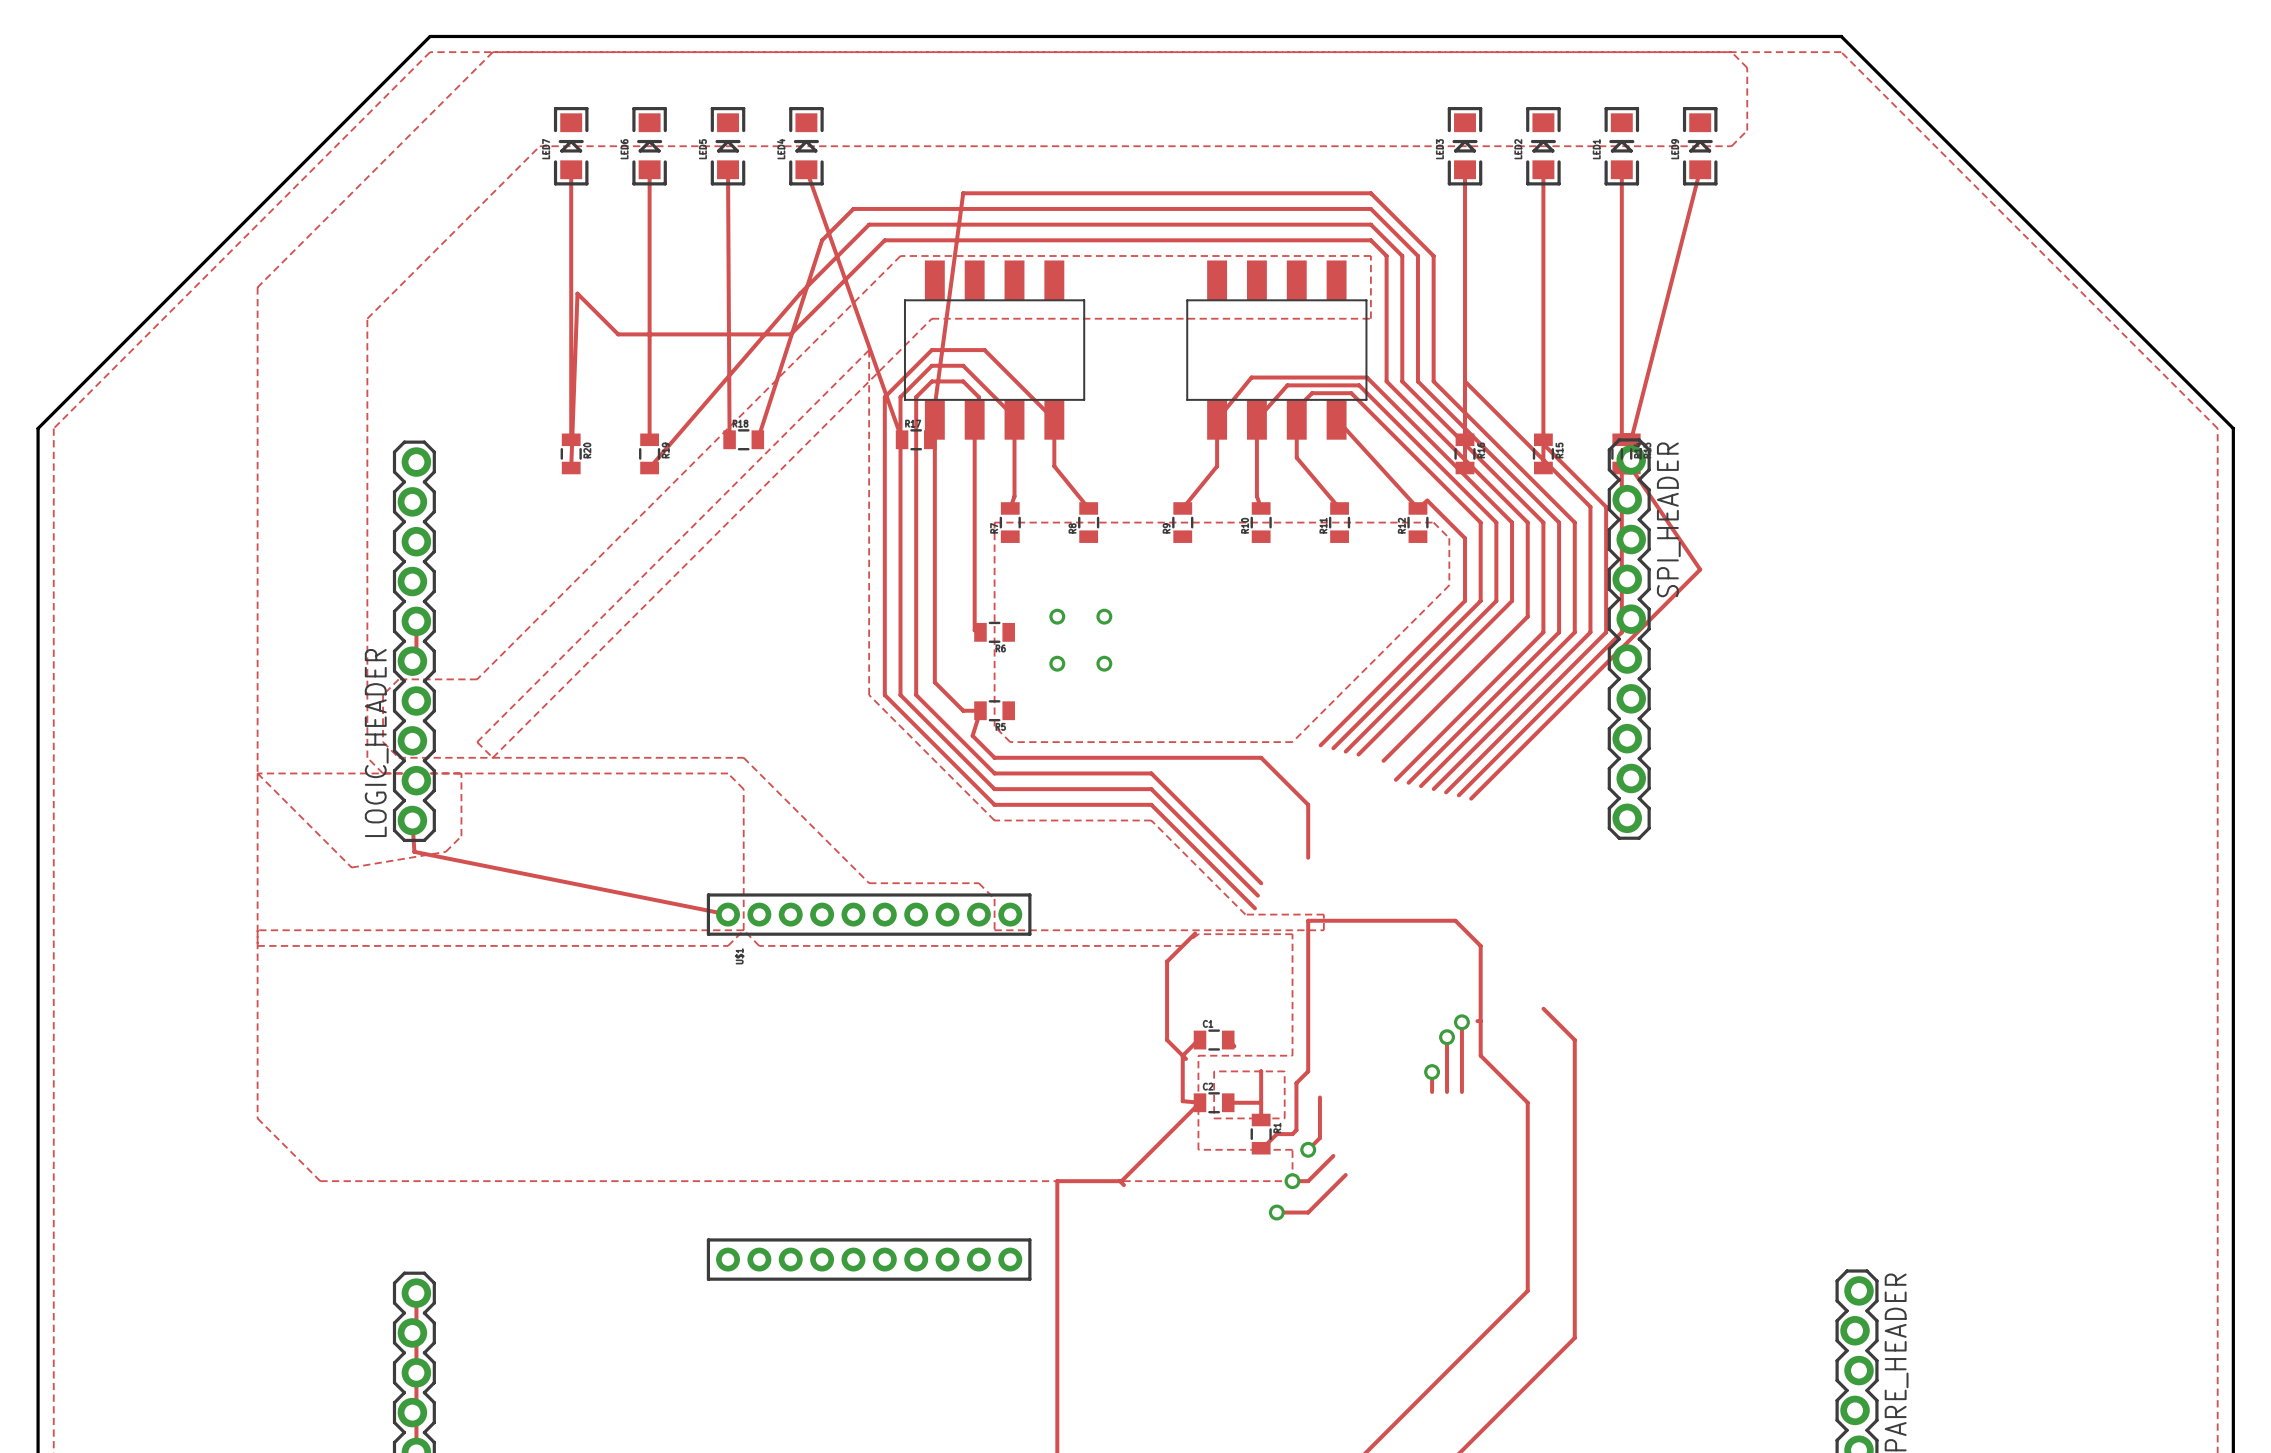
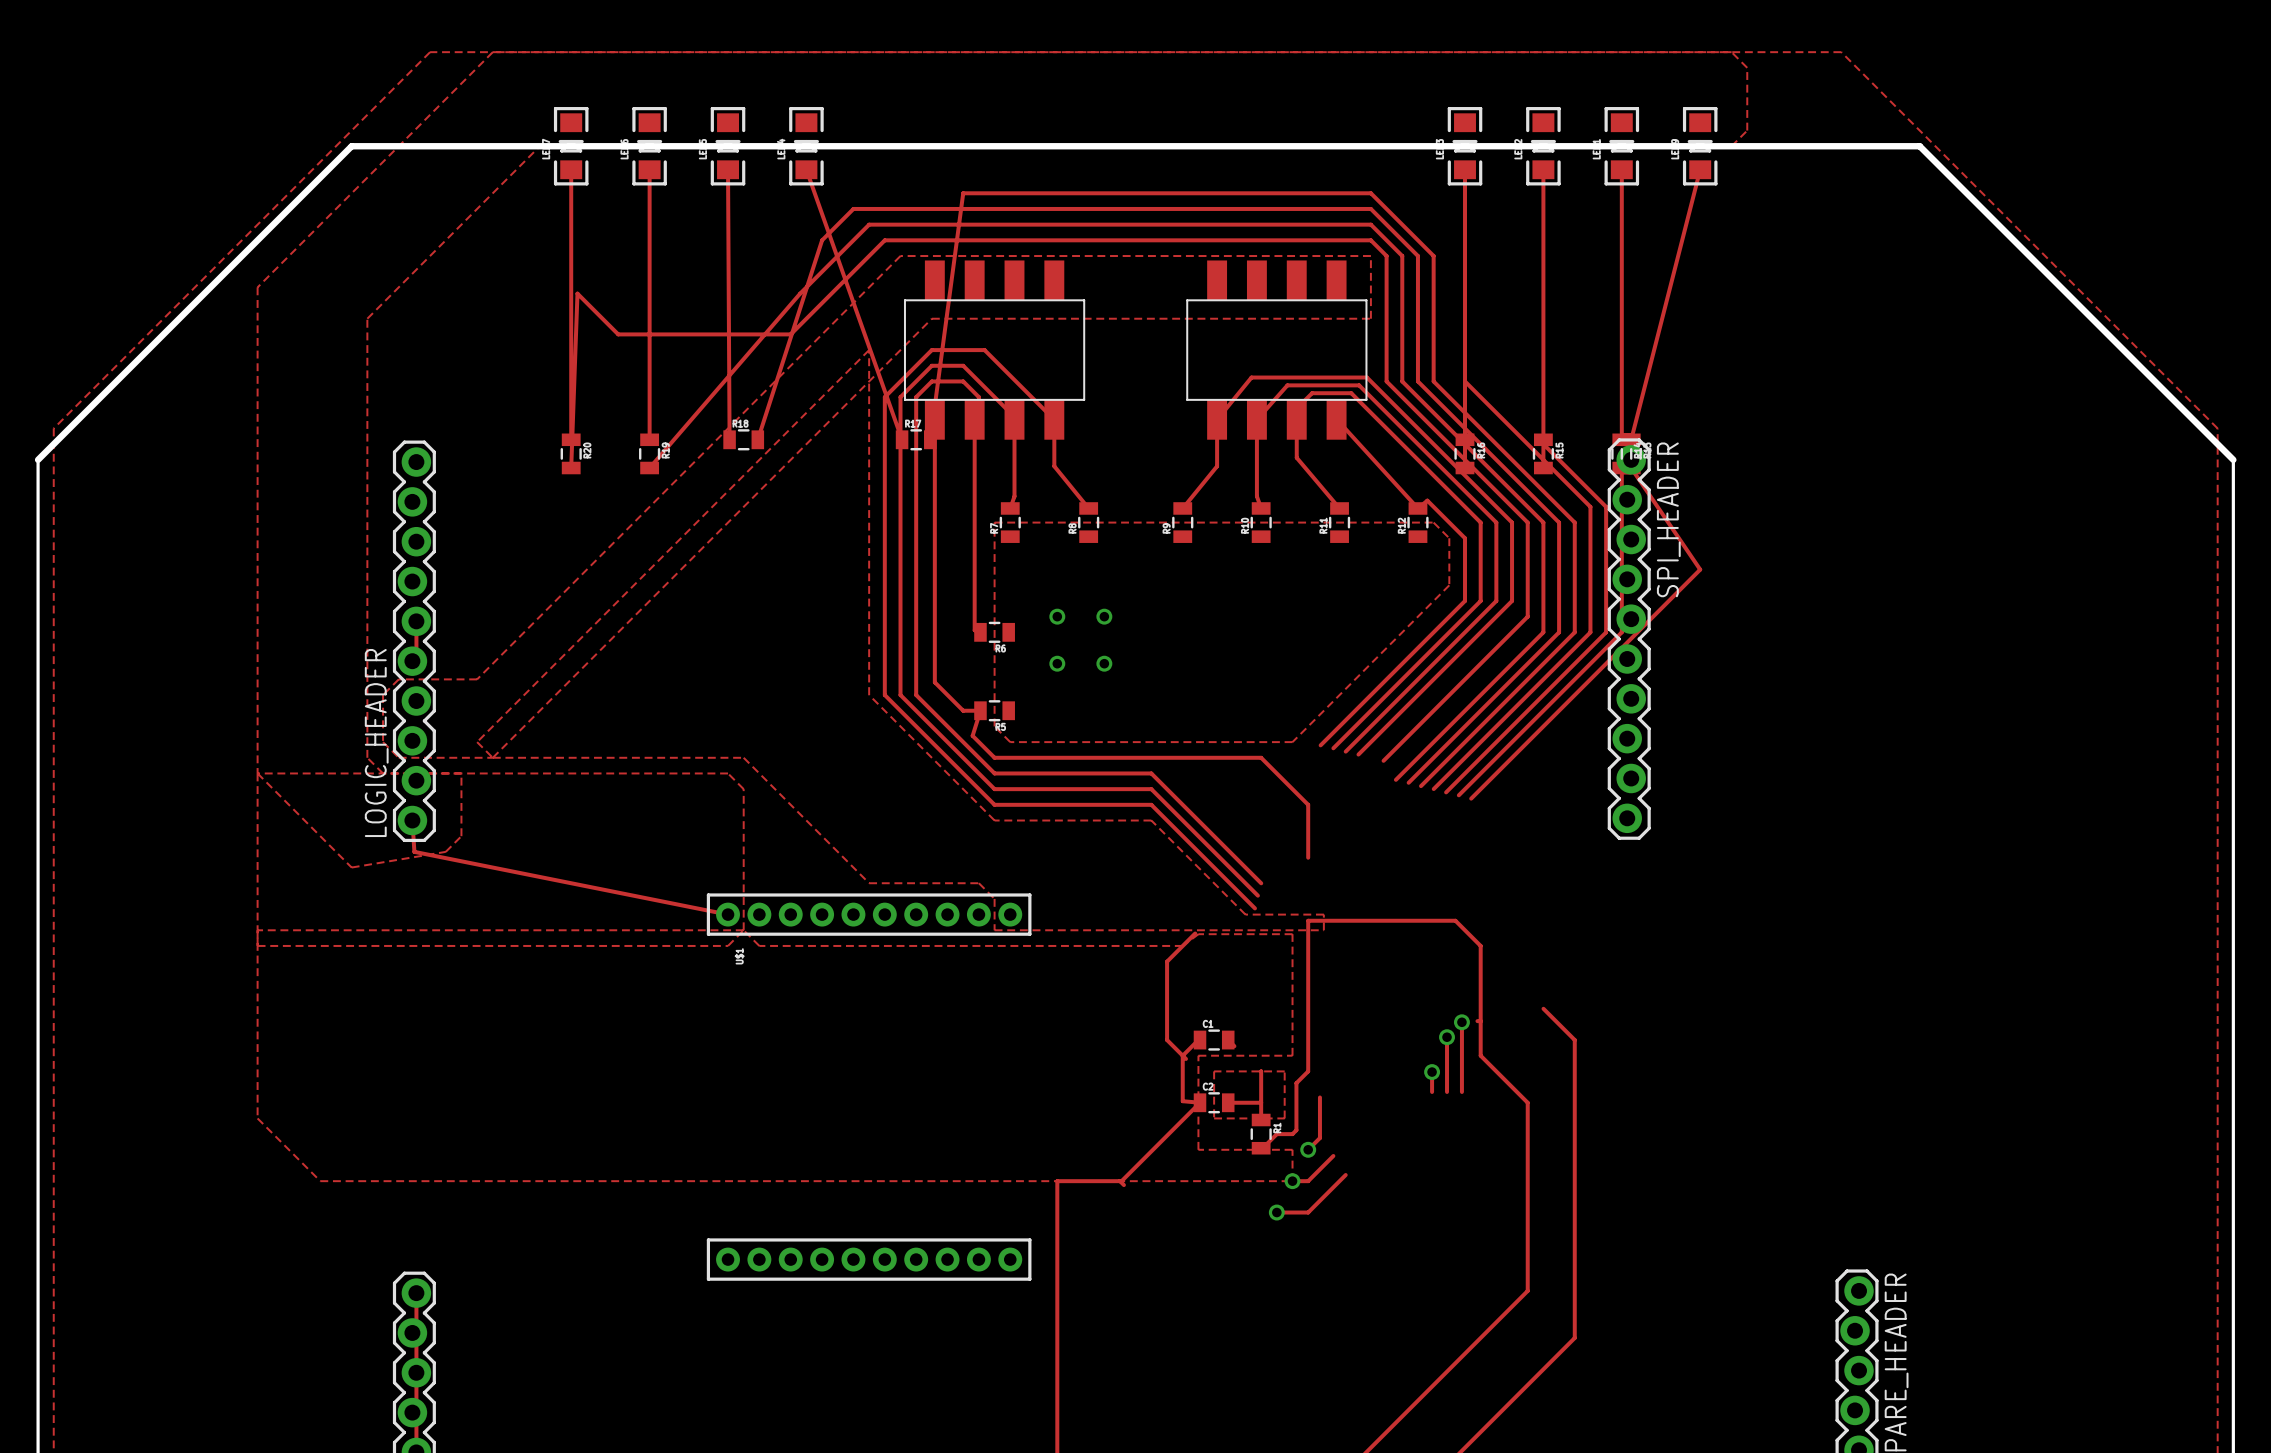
board edge: (38, 459) (38, 428) (430, 36) (1841, 36) (2233, 428) (2233, 459) -> (38, 459) (351, 146) (1919, 146) (2233, 459)

